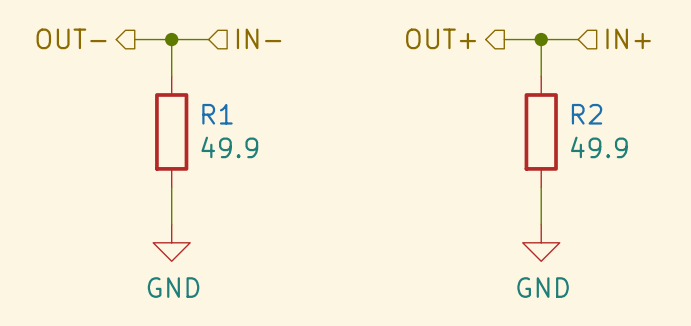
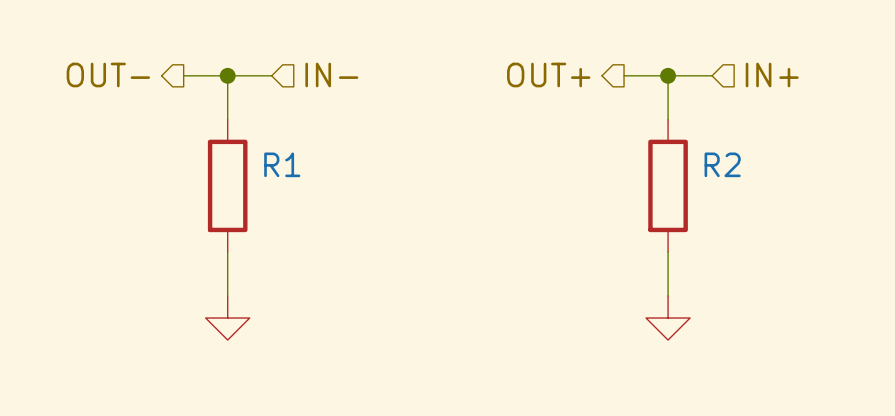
R1 value: 49.9 (229, 147) -> none
R2 value: 49.9 (599, 147) -> none
power symbol text: GND (173, 287) -> none
power symbol text: GND (543, 287) -> none

